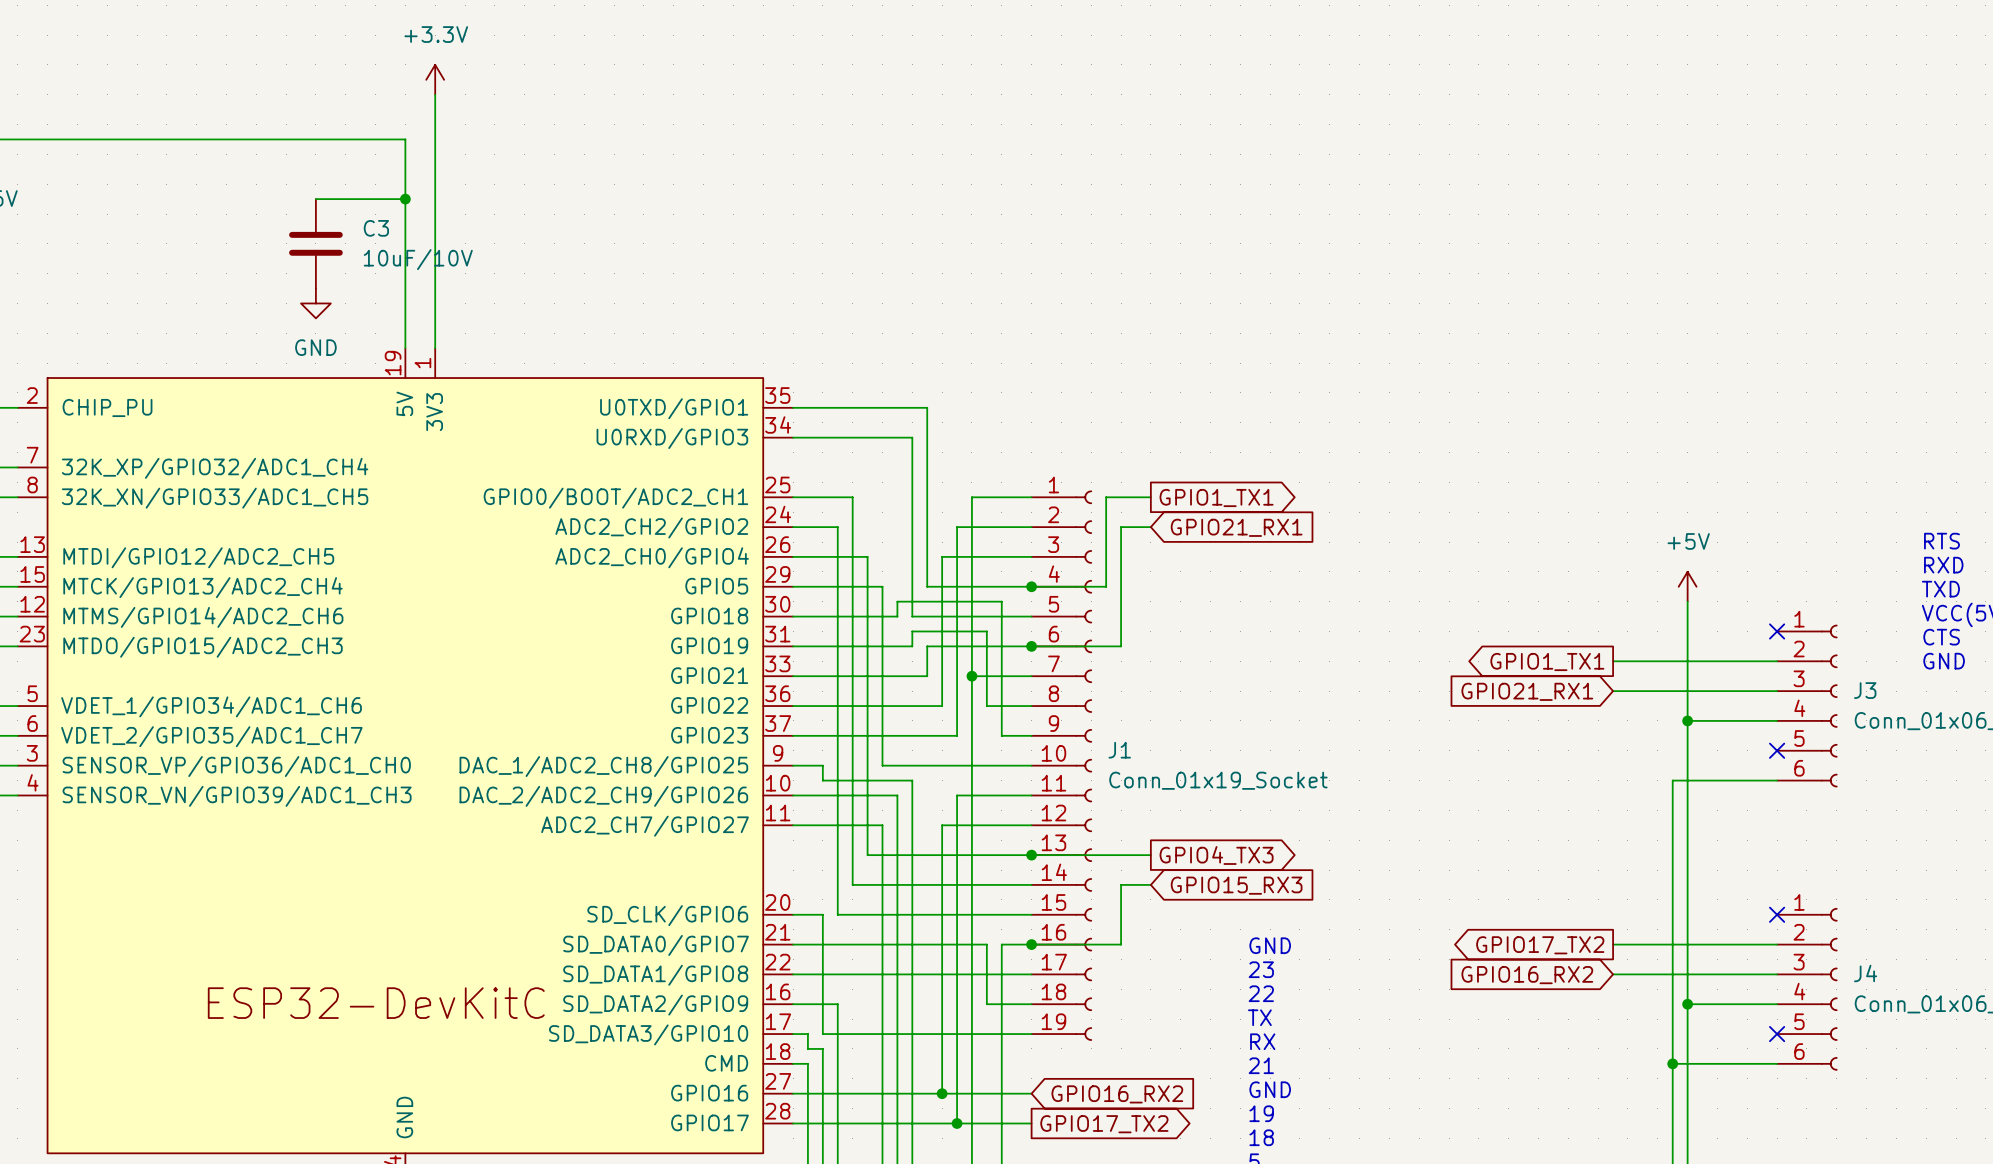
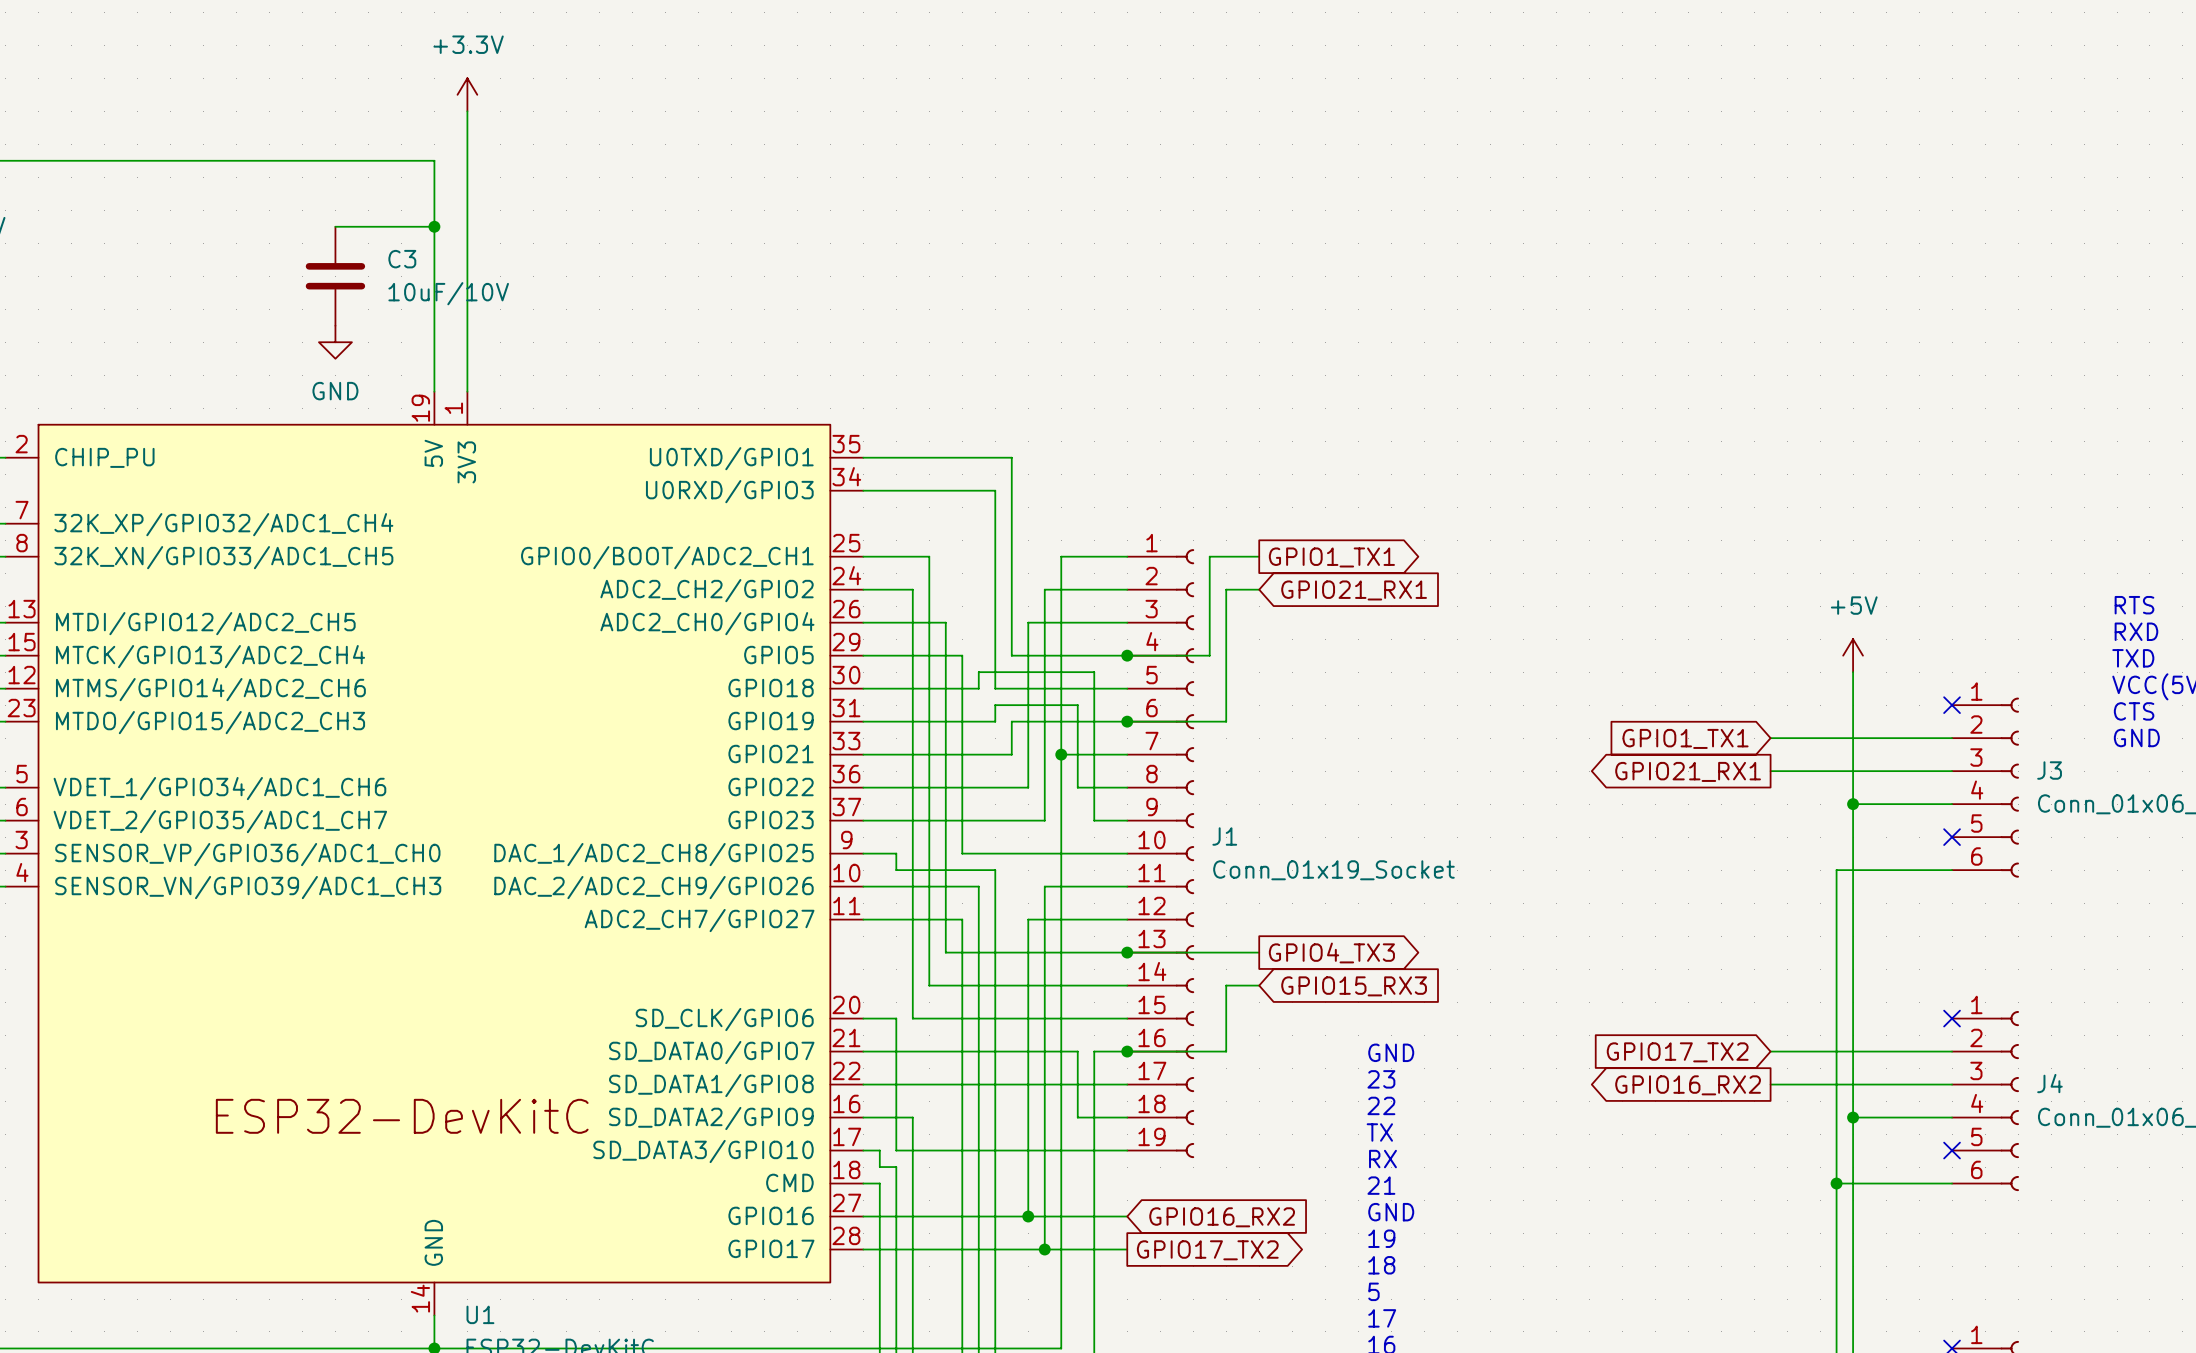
global label shape: output (1547, 662) -> input (1685, 738)
global label shape: input (1527, 691) -> output (1688, 771)
global label shape: output (1540, 945) -> input (1677, 1052)
global label shape: input (1527, 975) -> output (1688, 1085)

